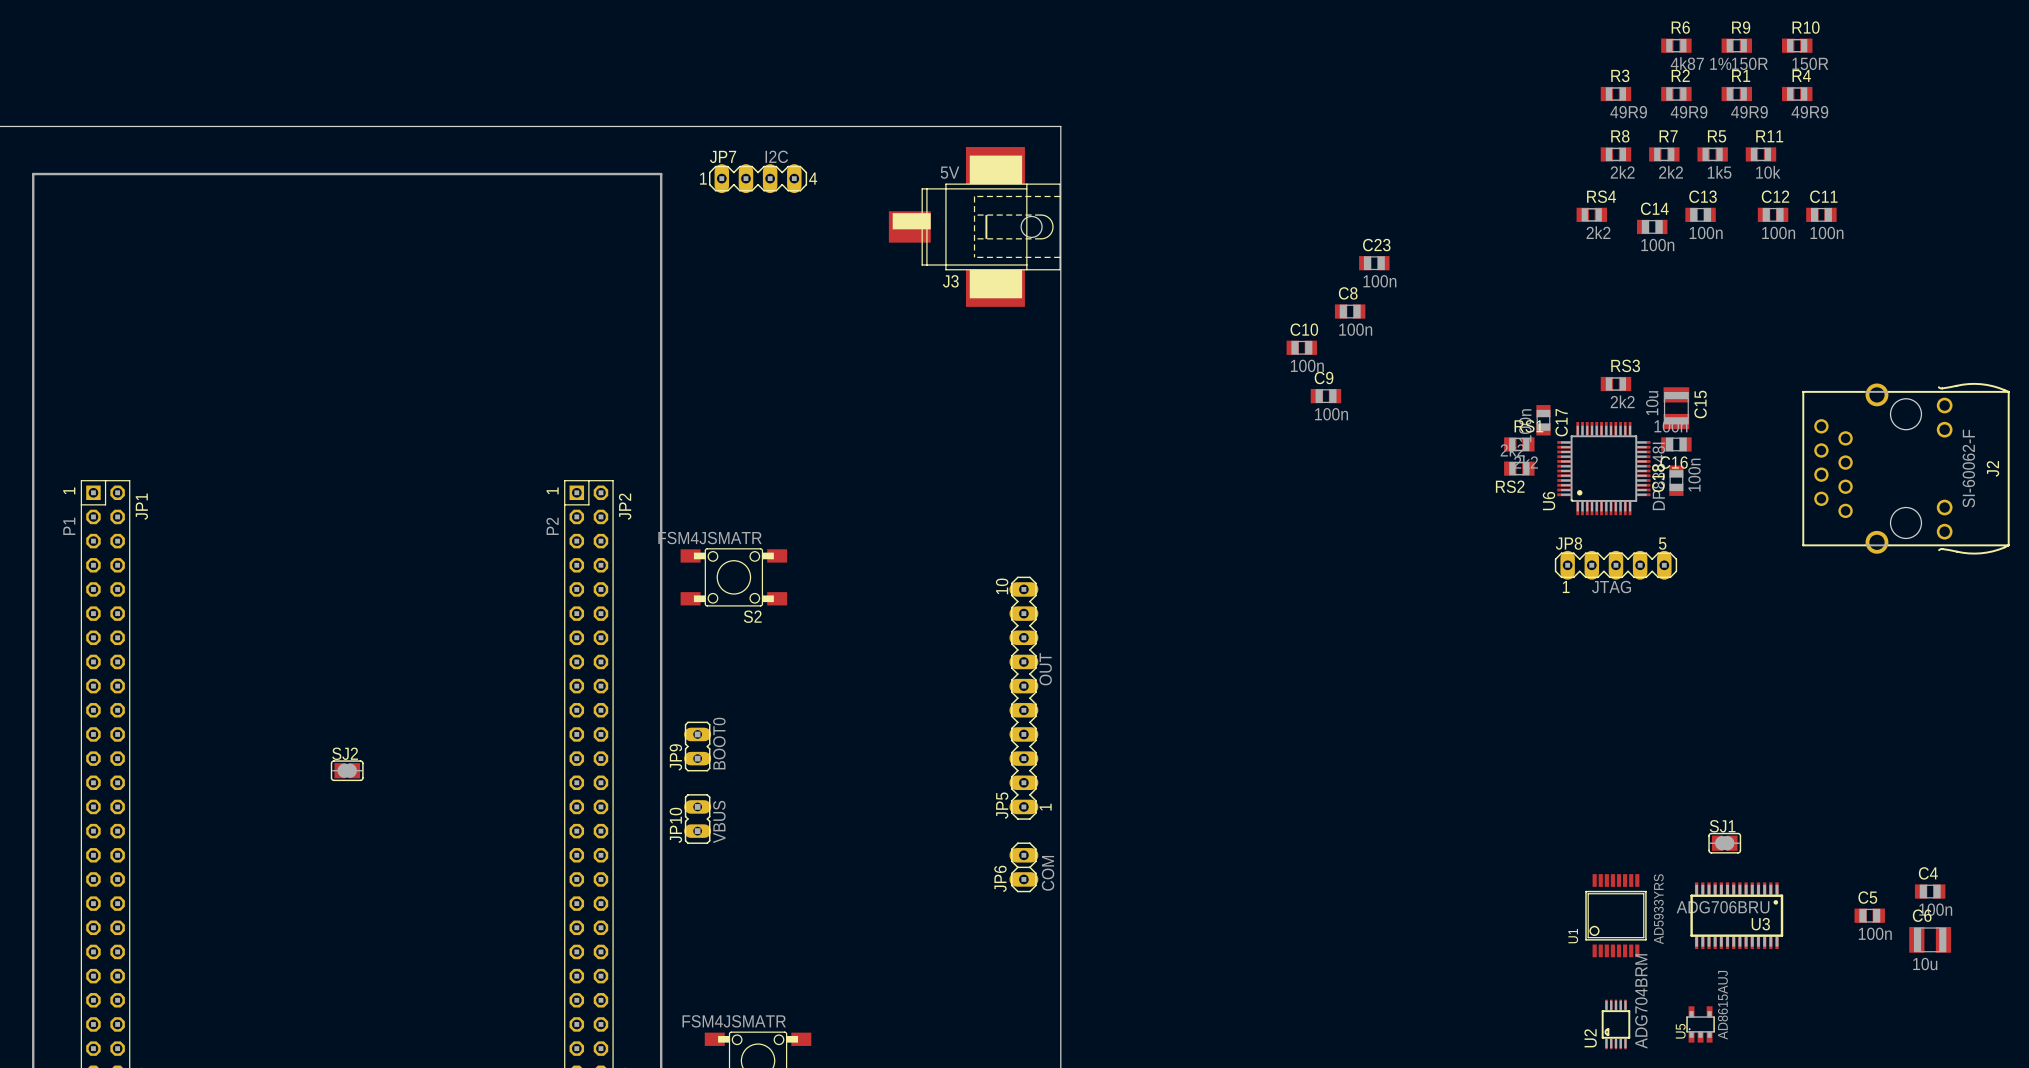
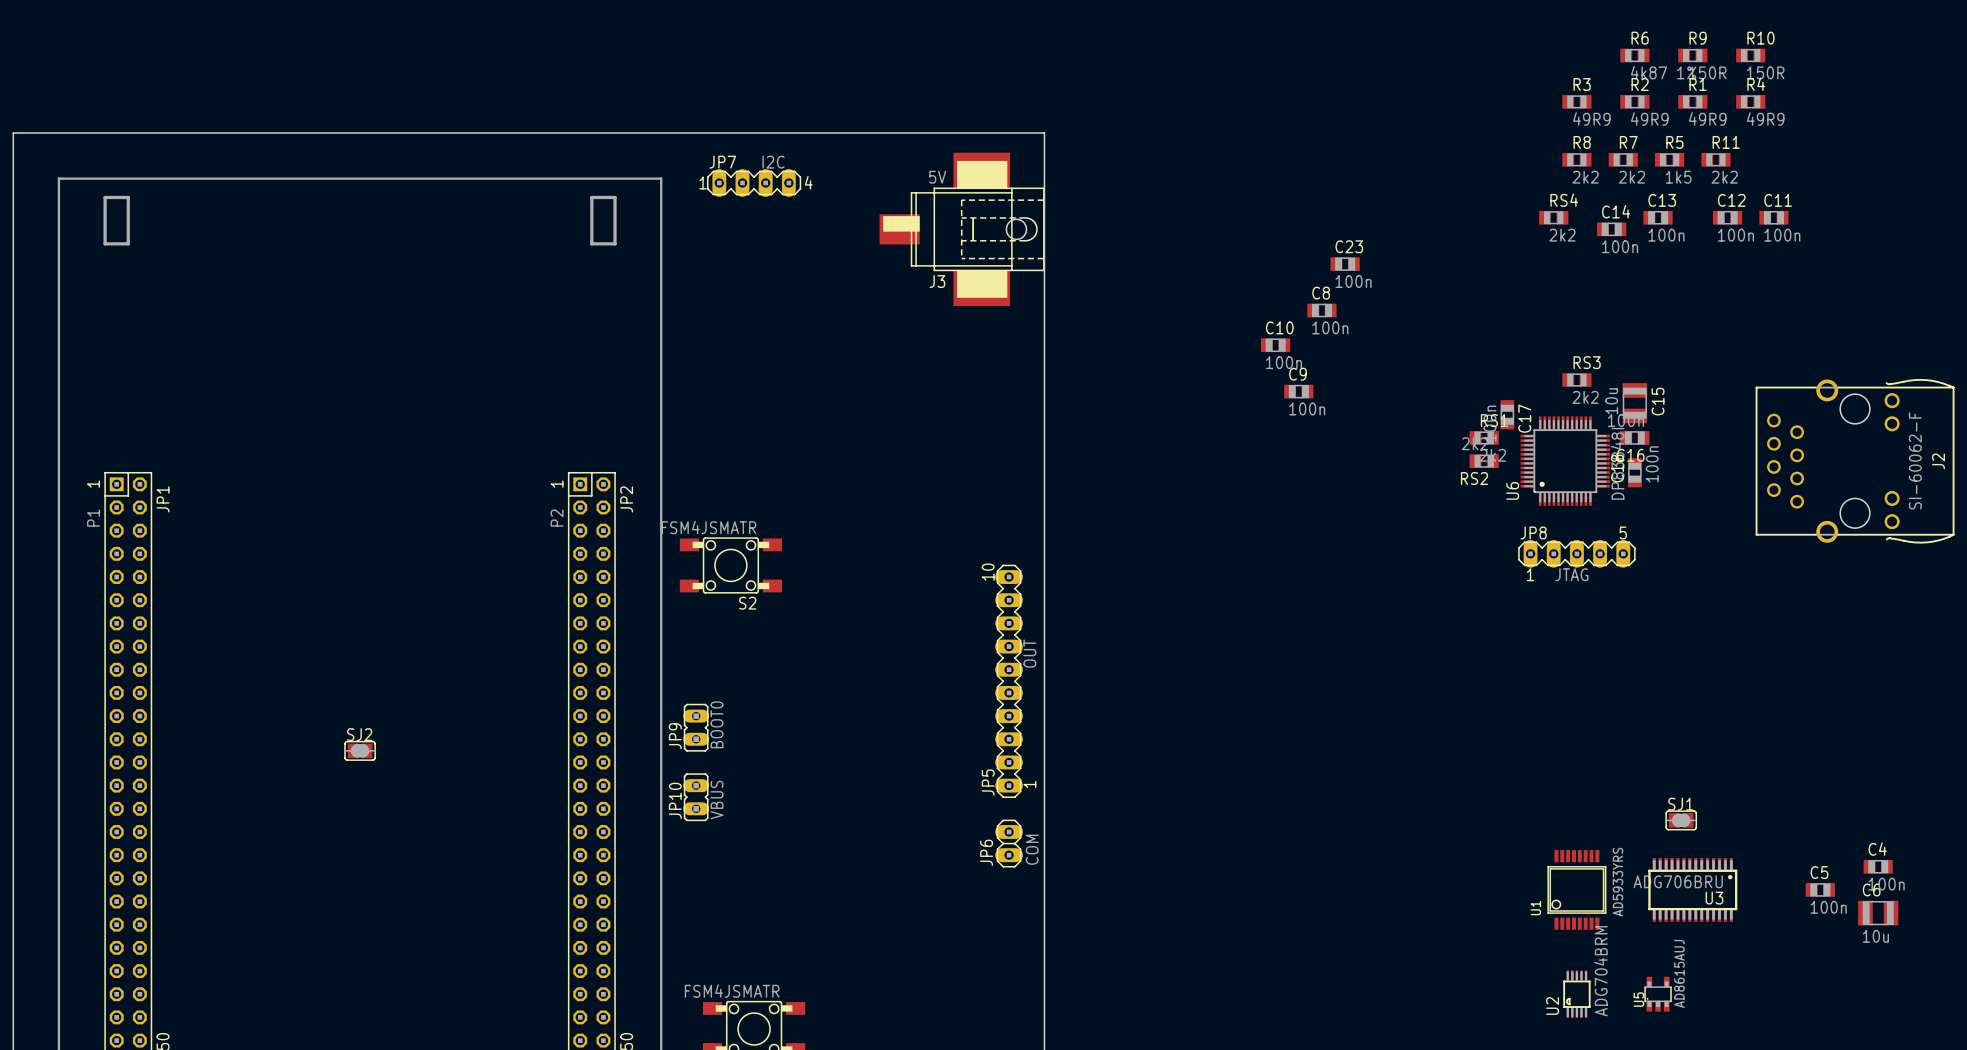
R11 value: 10k (1768, 172) -> 2k2 (1724, 177)
line: none -> (105, 197) (128, 197) (128, 243) (105, 243) (105, 197)
line: none -> (591, 197) (615, 197) (615, 243) (591, 243) (591, 197)

